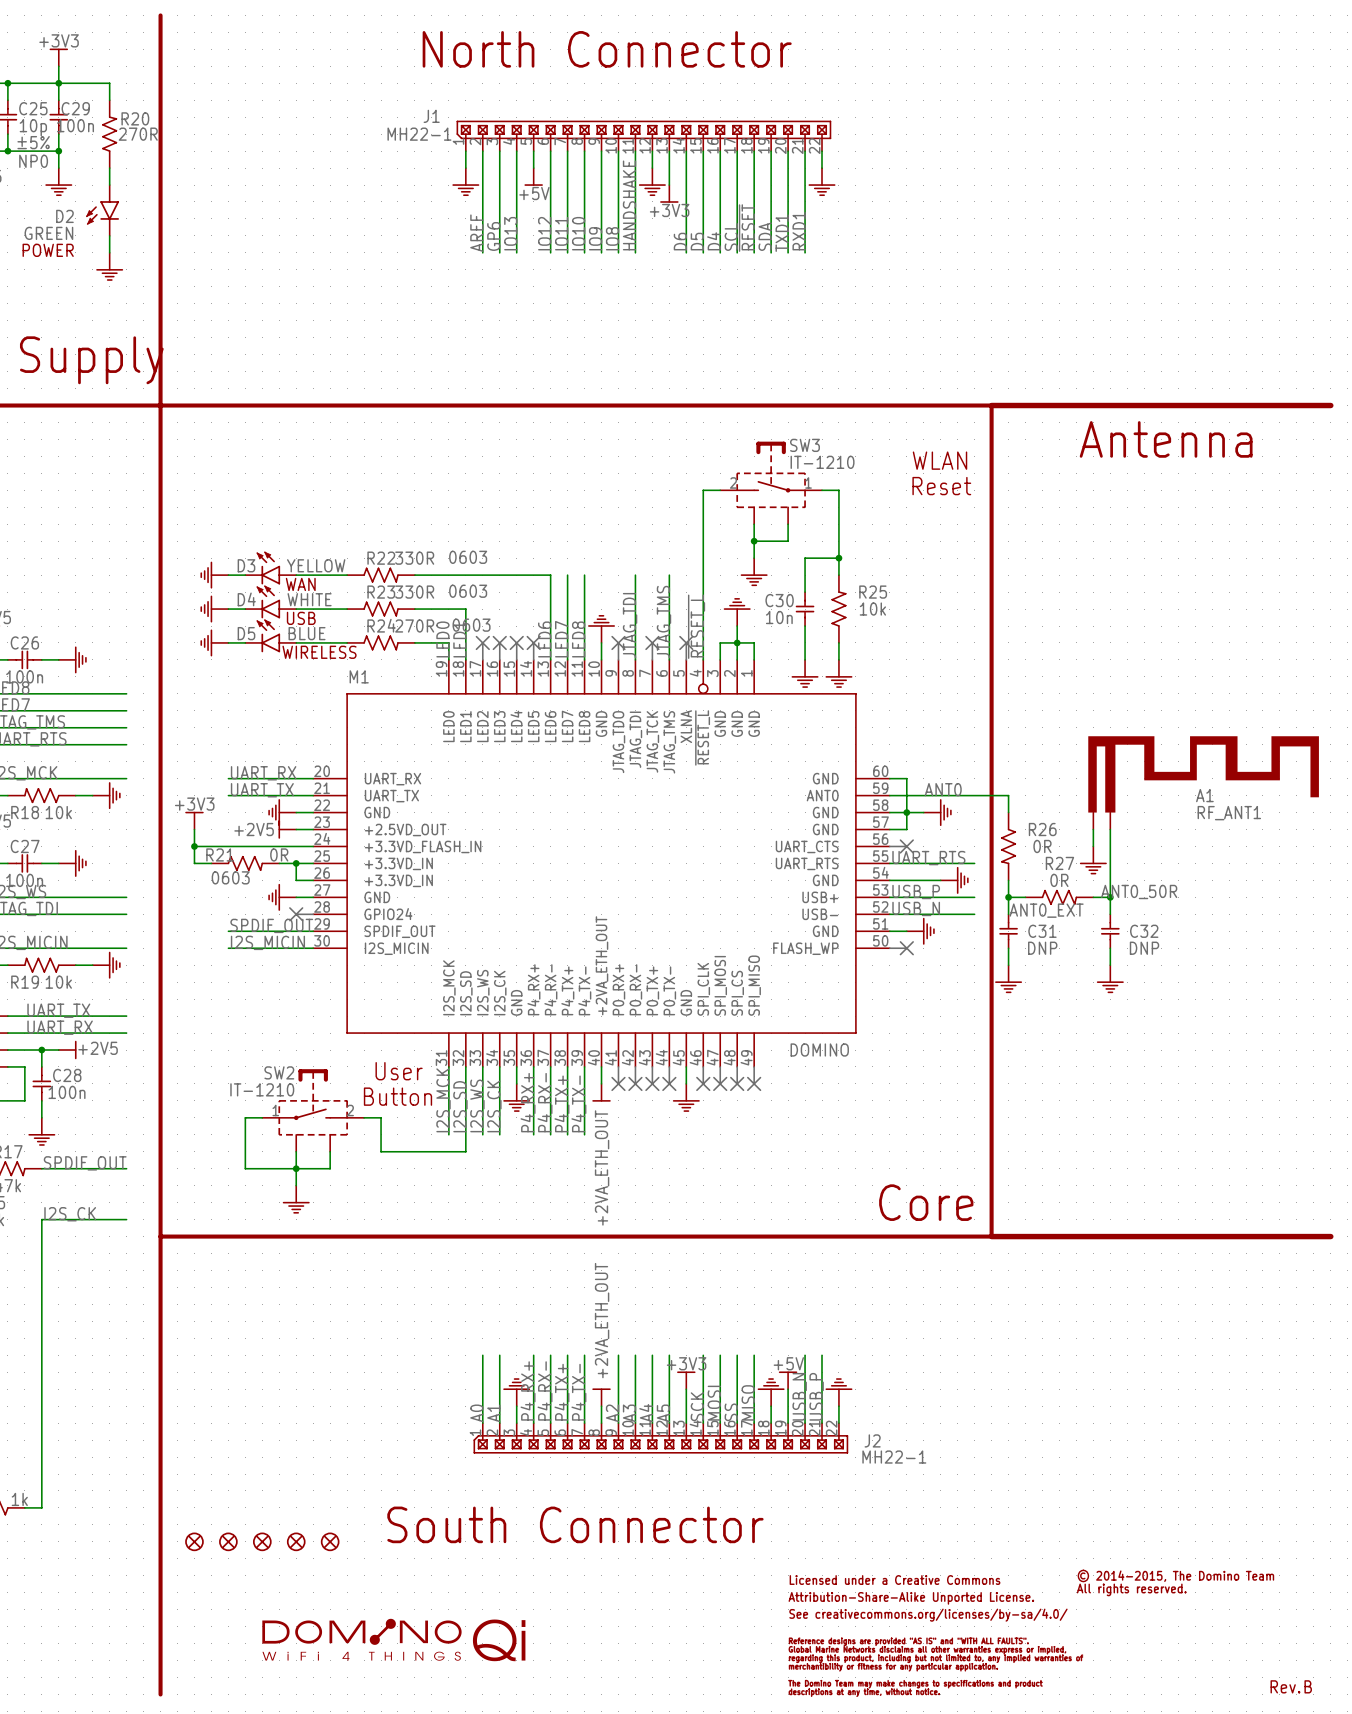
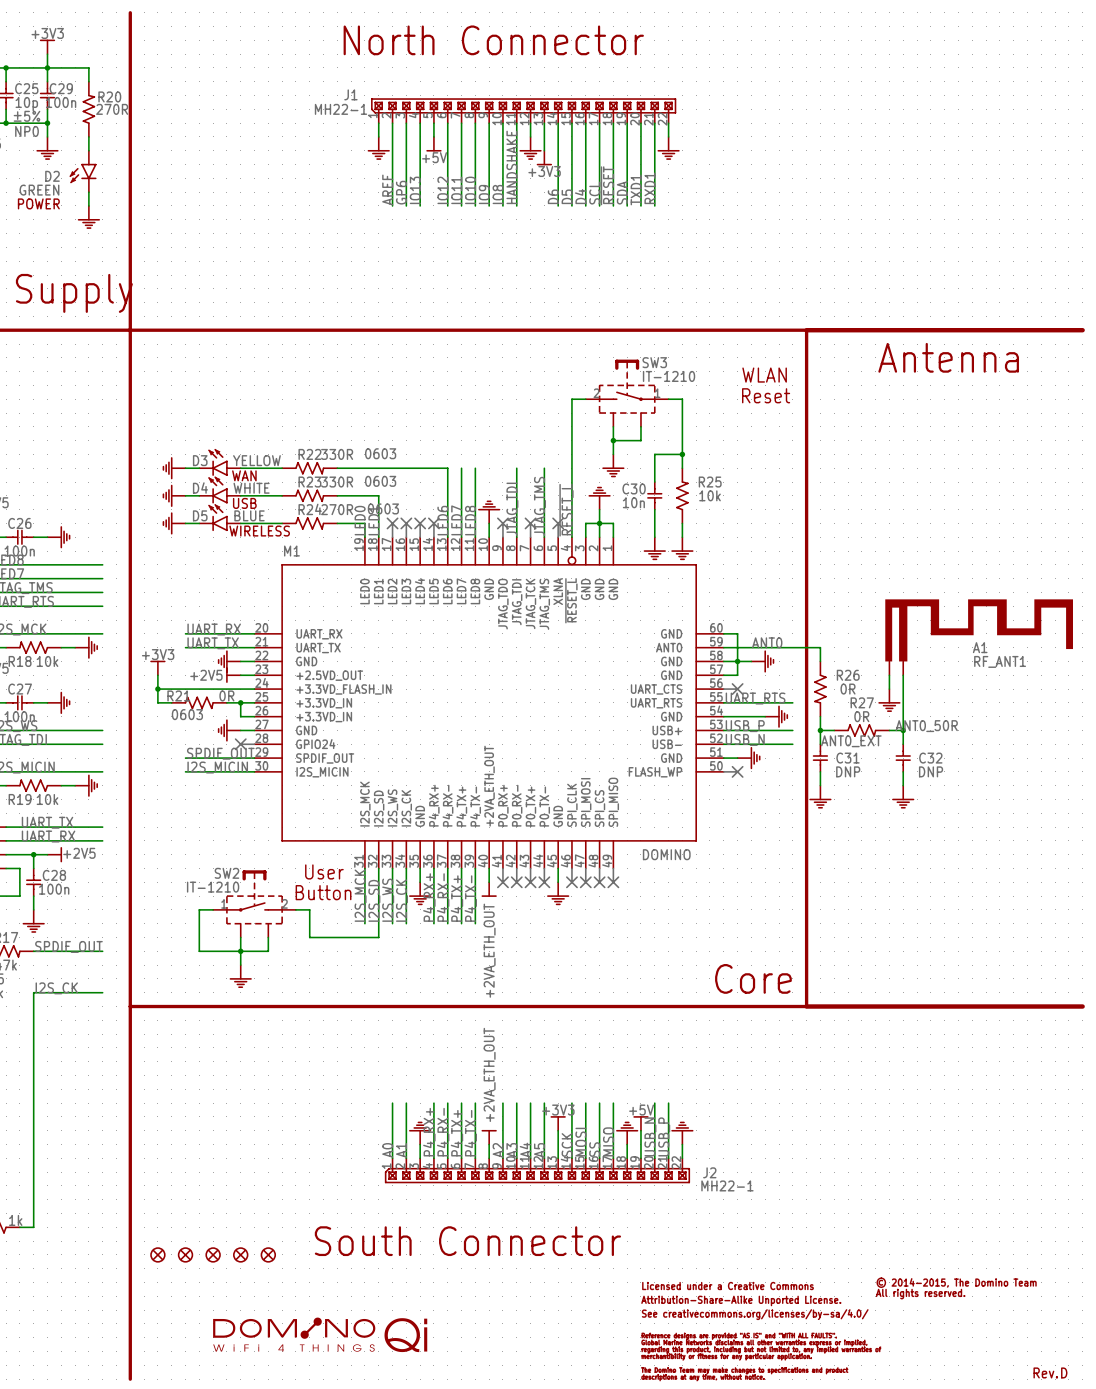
text: B (1308, 1686) -> D (1064, 1372)

